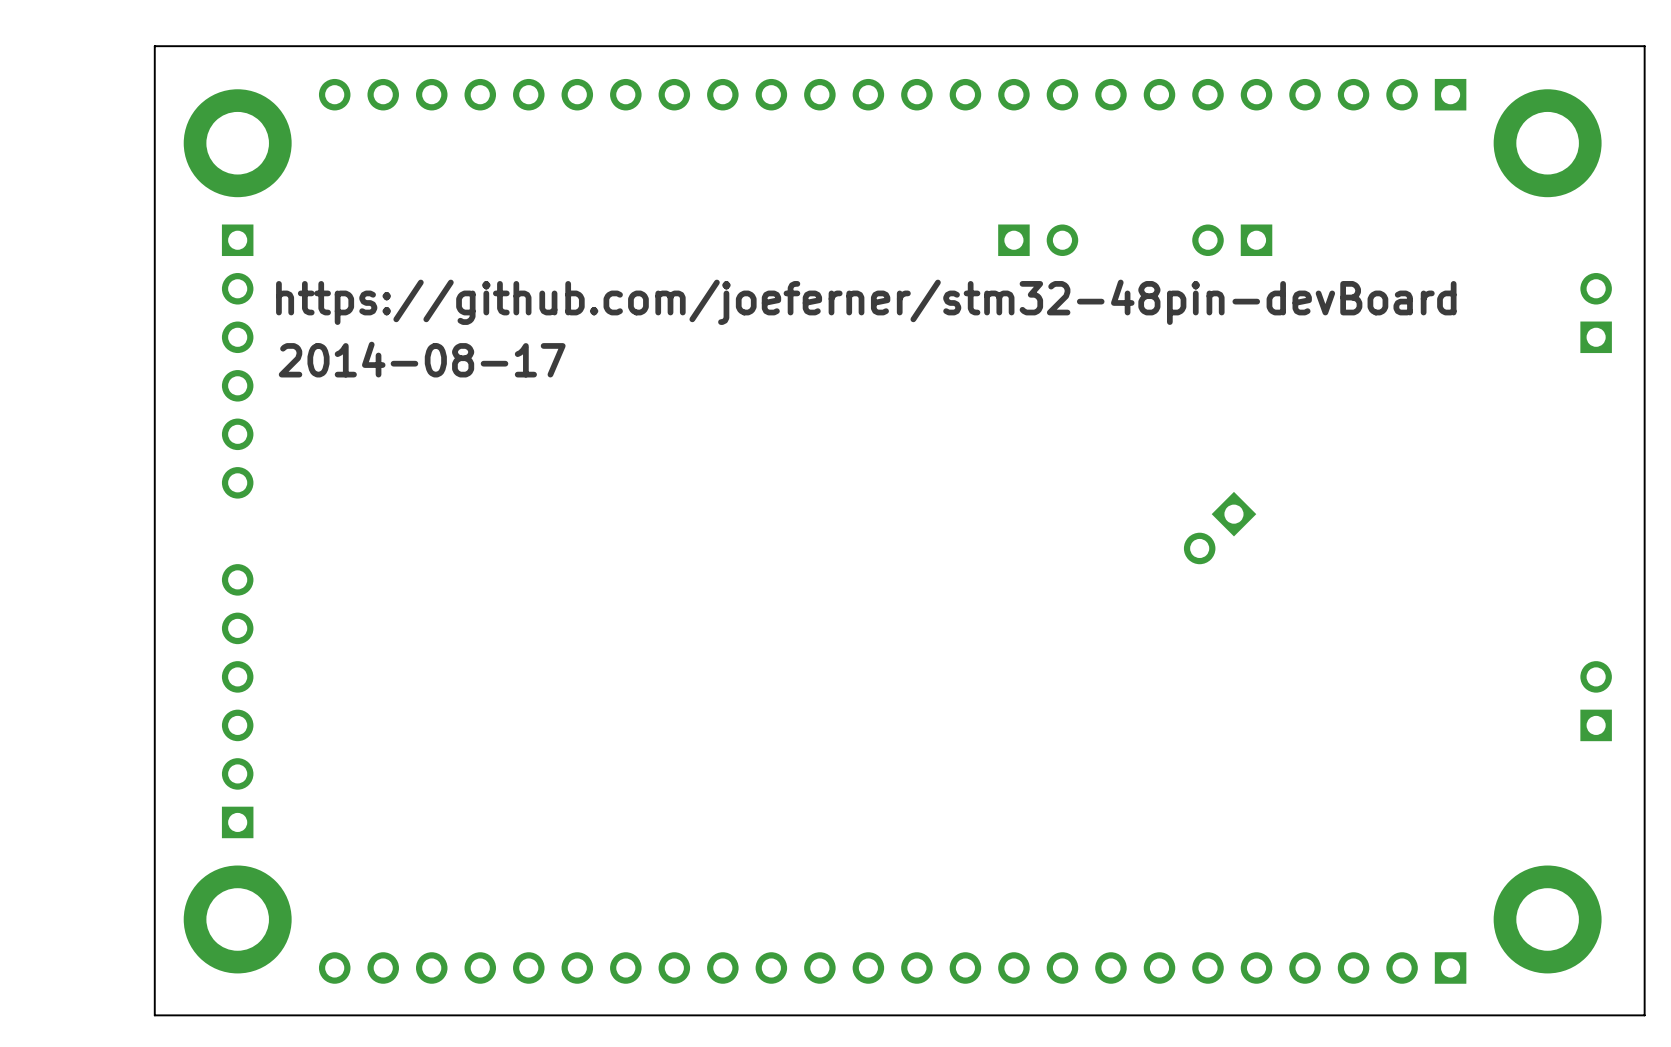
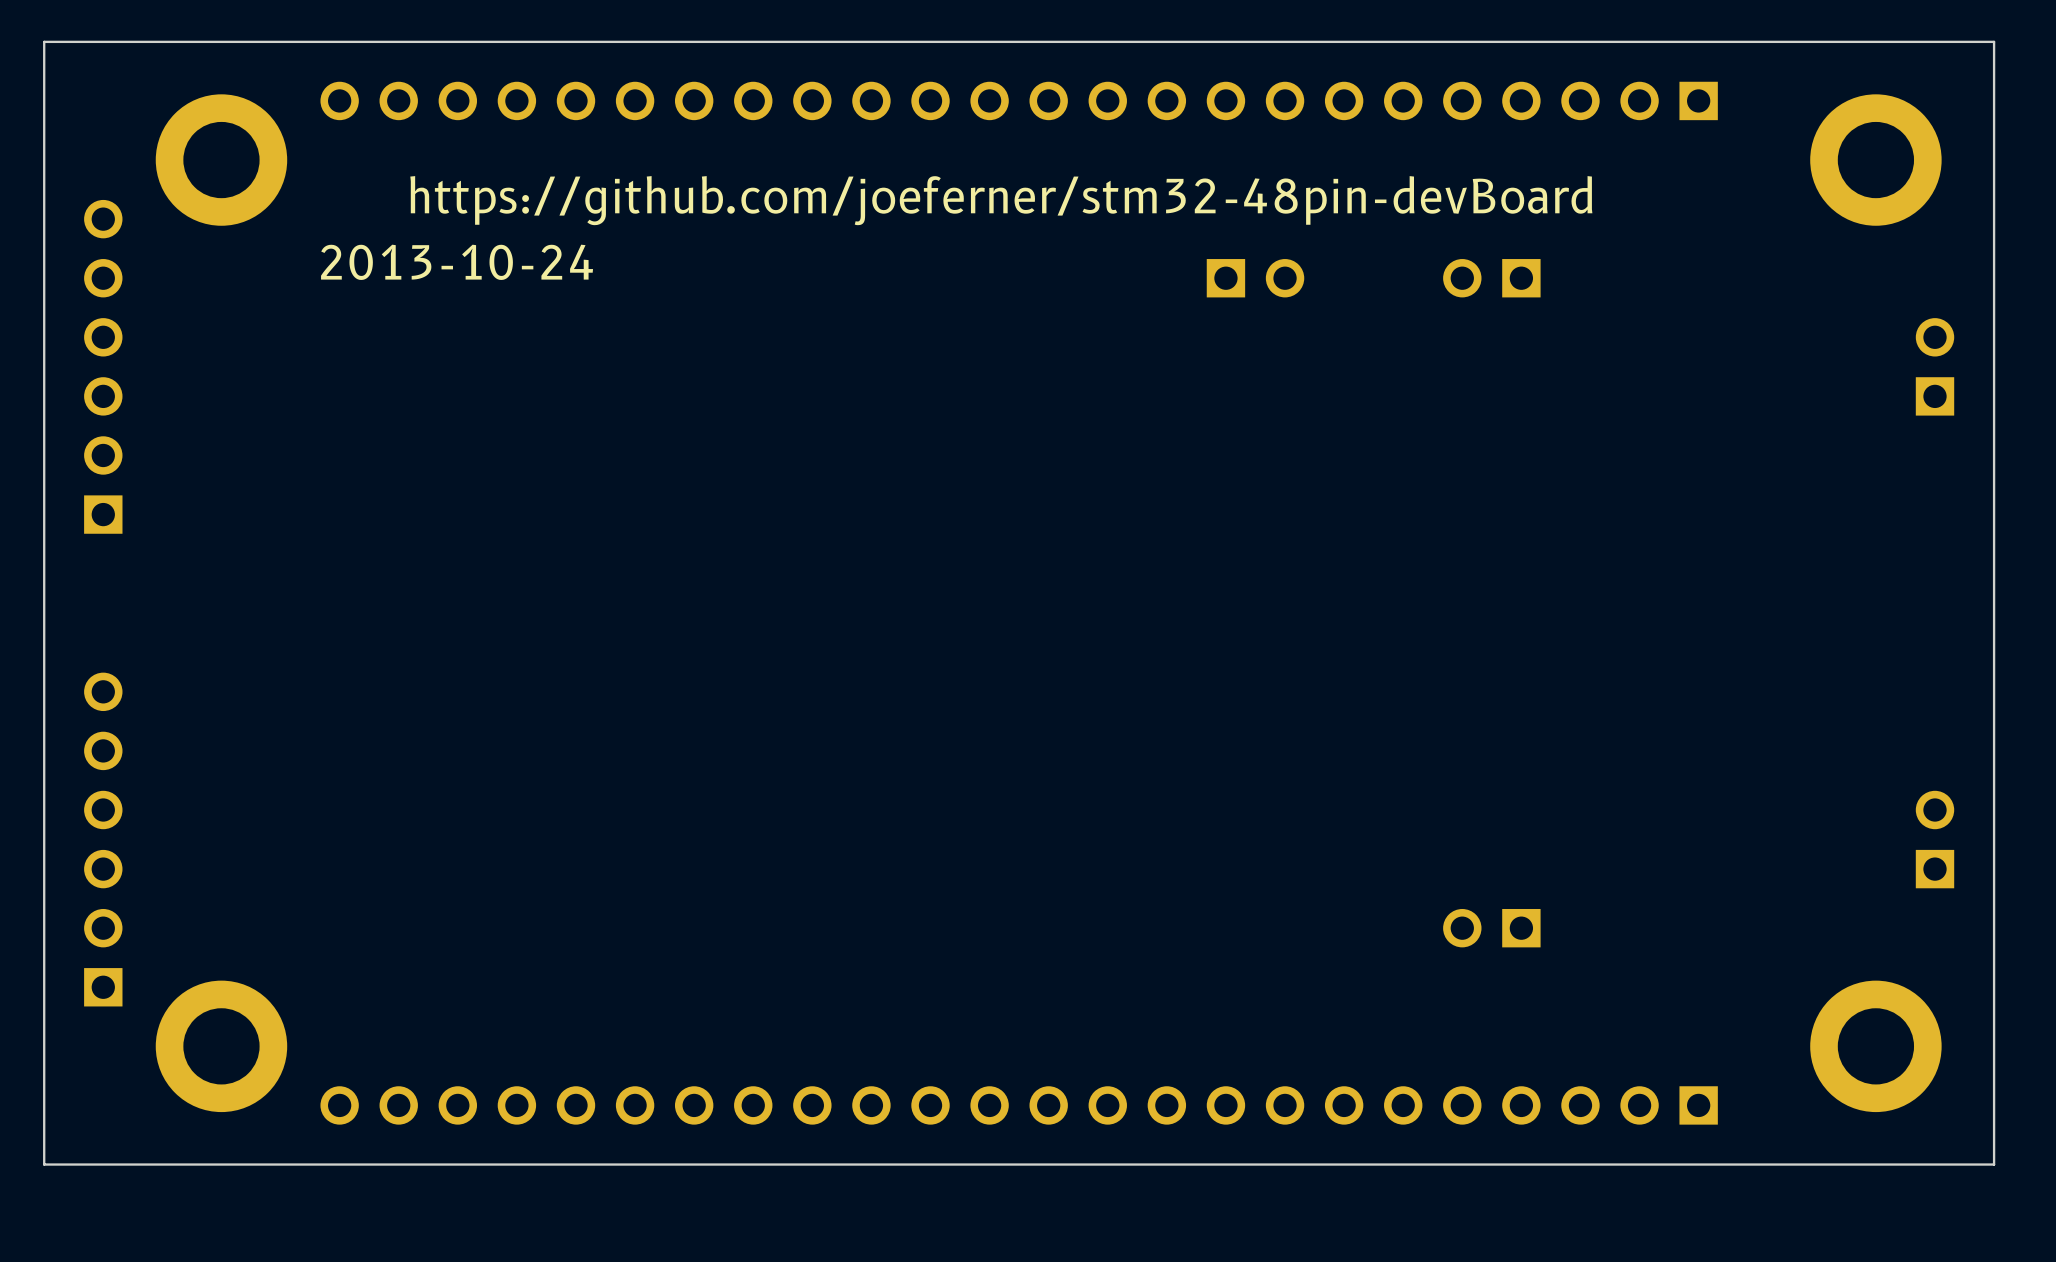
board edge: (154, 46) (154, 1015) (1644, 1015) (1644, 967) -> (179, 41) (44, 41) (44, 1164) (1994, 1164)
part position: (892, 94) -> (1019, 100)
part position: (237, 143) -> (221, 160)
text: none -> 2013-10-24 (457, 262)
text position: https://github.com/joeferner/stm32-48pin-devBoard (866, 302) -> https://github.com/joeferner/stm32-48pin-devBoard (1001, 200)
text: 2014-08-17 (422, 359) -> none
part rotation: 0° (237, 361) -> 180° (103, 366)
part: (1220, 528) -> none
part position: (237, 701) -> (103, 839)
part: none -> (1491, 928)
part position: (237, 919) -> (221, 1046)
part position: (1547, 919) -> (1875, 1046)
part position: (892, 967) -> (1019, 1105)

